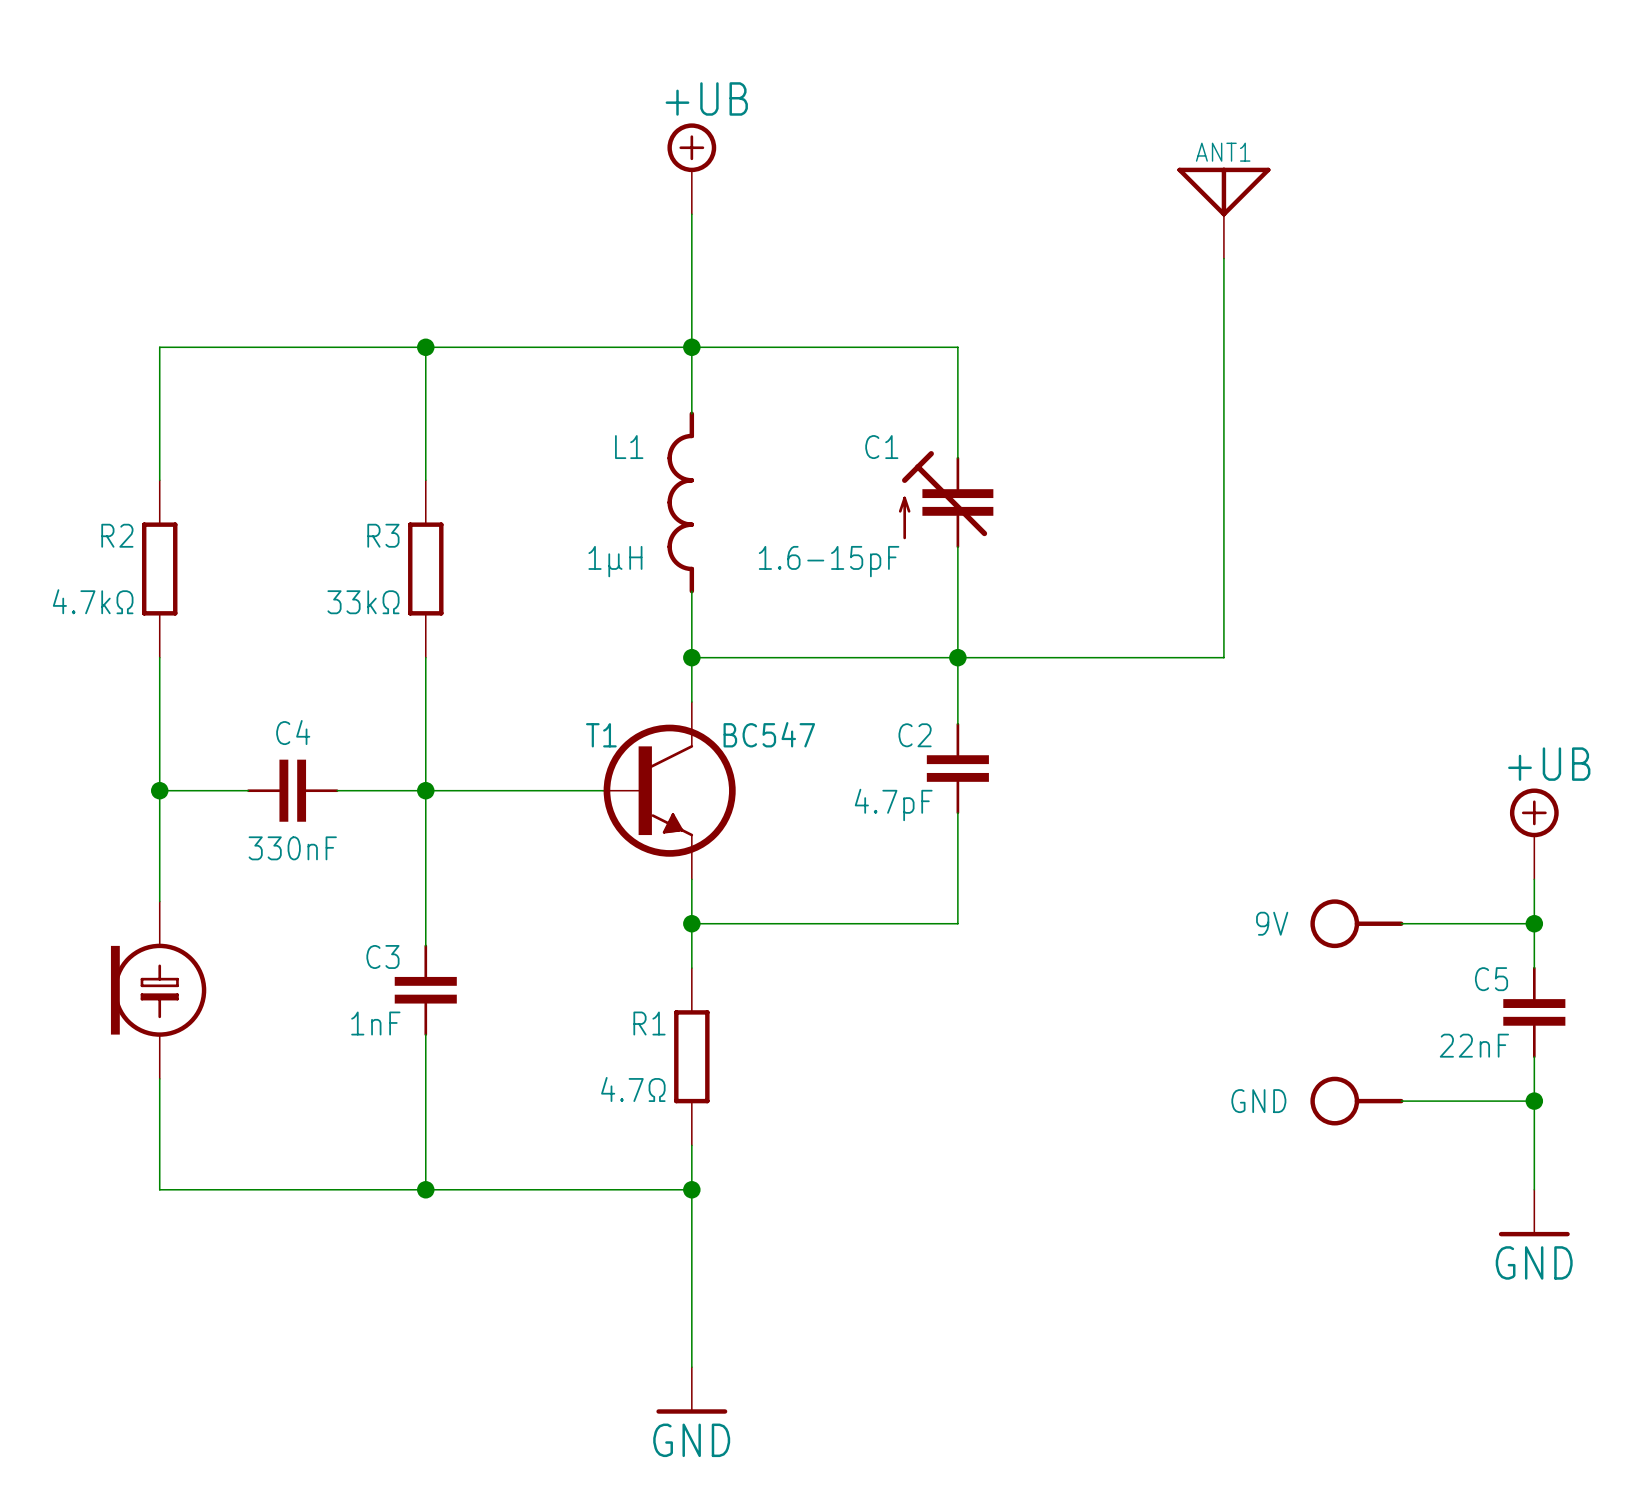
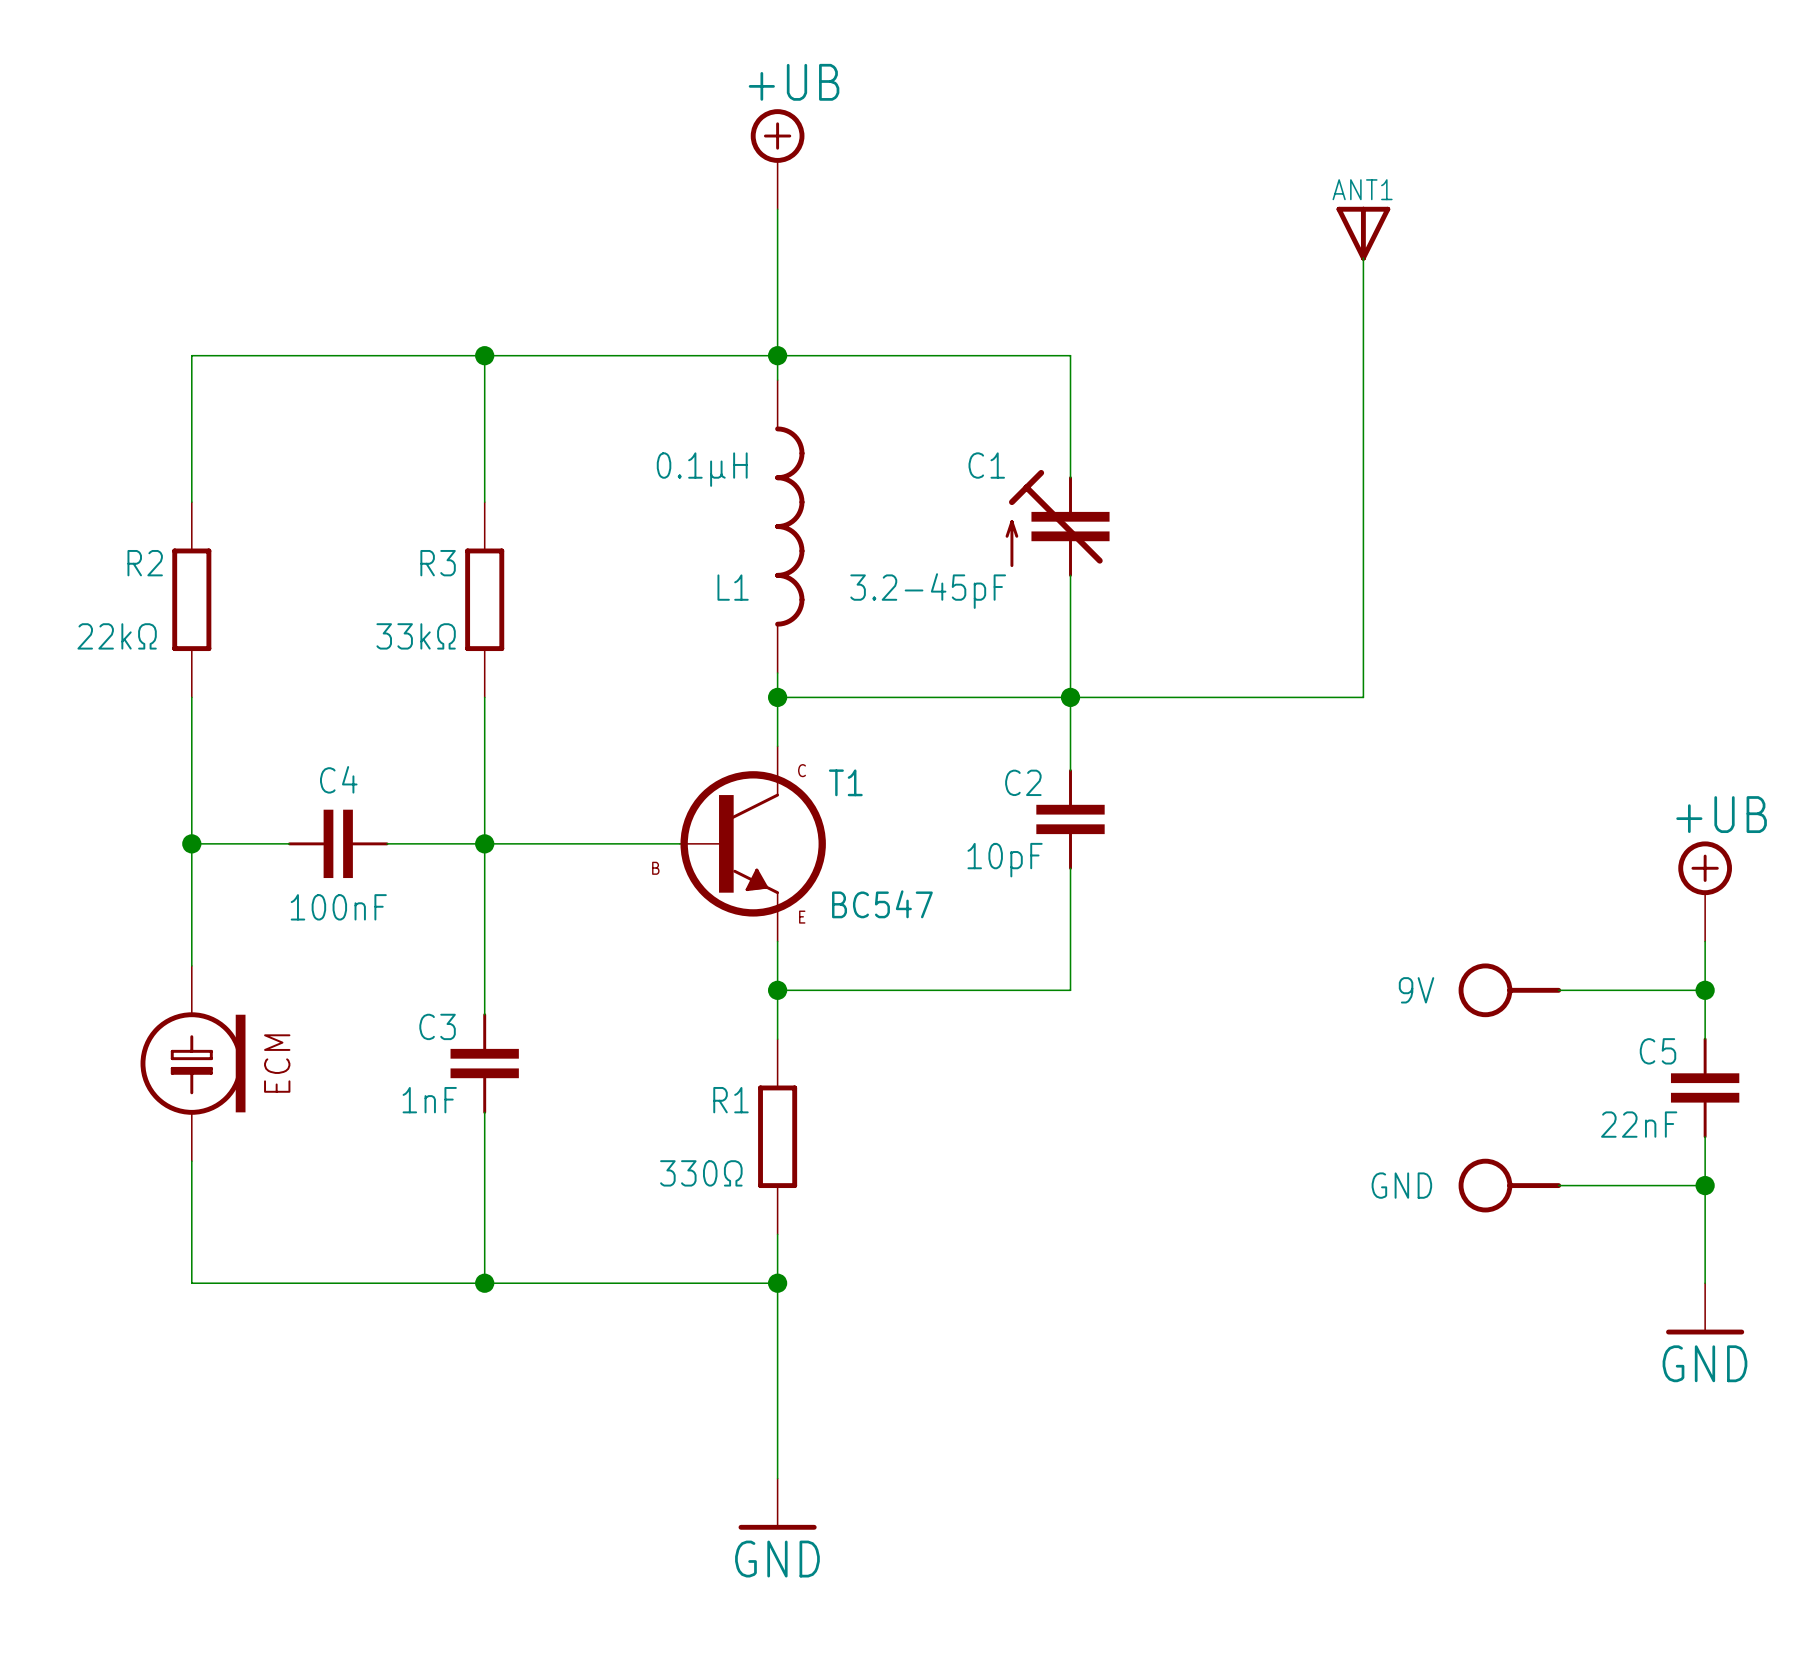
ANT1 symbol: [1177, 167, 1271, 259] -> [1336, 206, 1391, 261]
L1 symbol: [667, 411, 695, 594] -> [775, 380, 805, 674]
L1 name position: L1 (629, 447) -> L1 (733, 587)
L1 value: 1μH (615, 561) -> 0.1μH (702, 469)
C1 value: 1.6-15pF (829, 561) -> 3.2-45pF (928, 591)
R2 value: 4.7kΩ (93, 601) -> 22kΩ (117, 636)
T1 text: none -> C (802, 770)
T1 value position: BC547 (769, 734) -> BC547 (882, 904)
T1 name position: T1 (601, 735) -> T1 (845, 782)
C2 value: 4.7pF (893, 804) -> 10pF (1005, 860)
T1 text: none -> B (655, 868)
C4 value: 330nF (292, 848) -> 100nF (338, 907)
T1 text: none -> E (802, 917)
part symbol: [110, 901, 207, 1079] -> [140, 965, 246, 1162]
R1 value: 4.7Ω (633, 1089) -> 330Ω (701, 1173)

